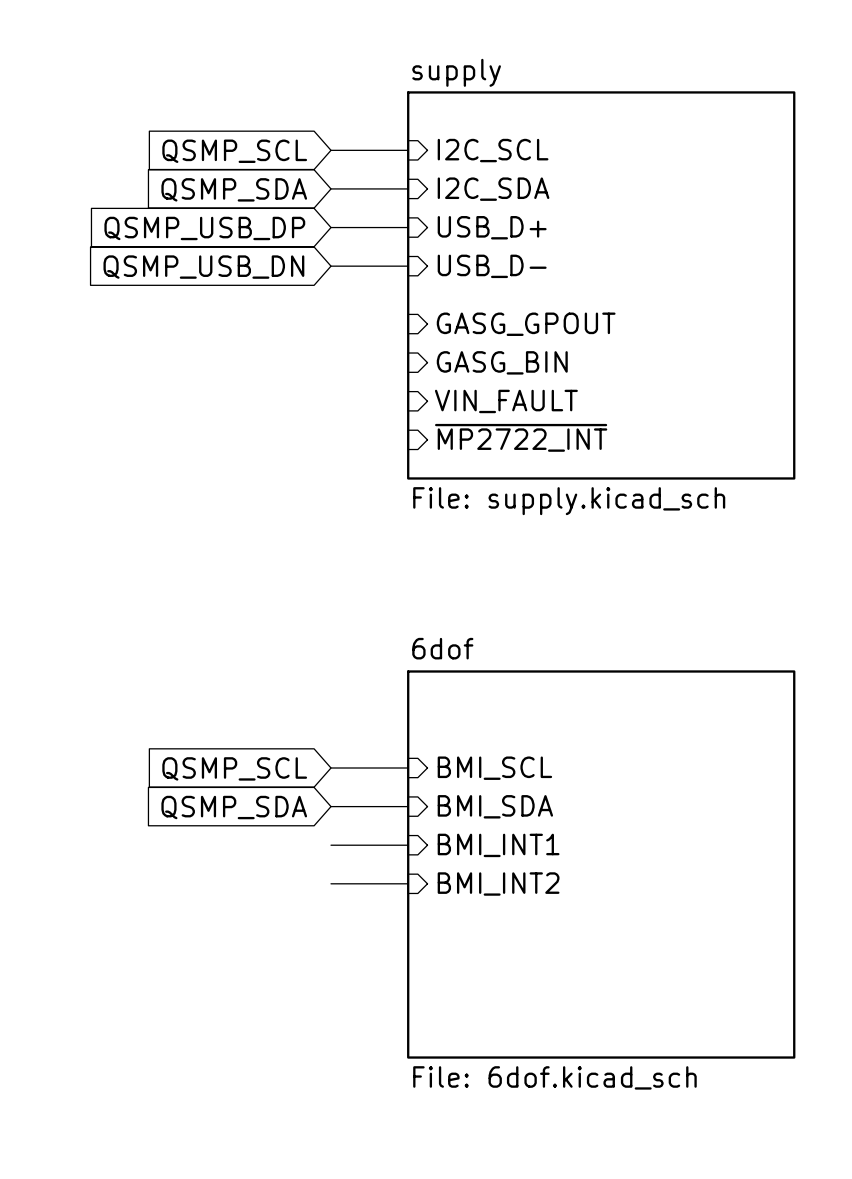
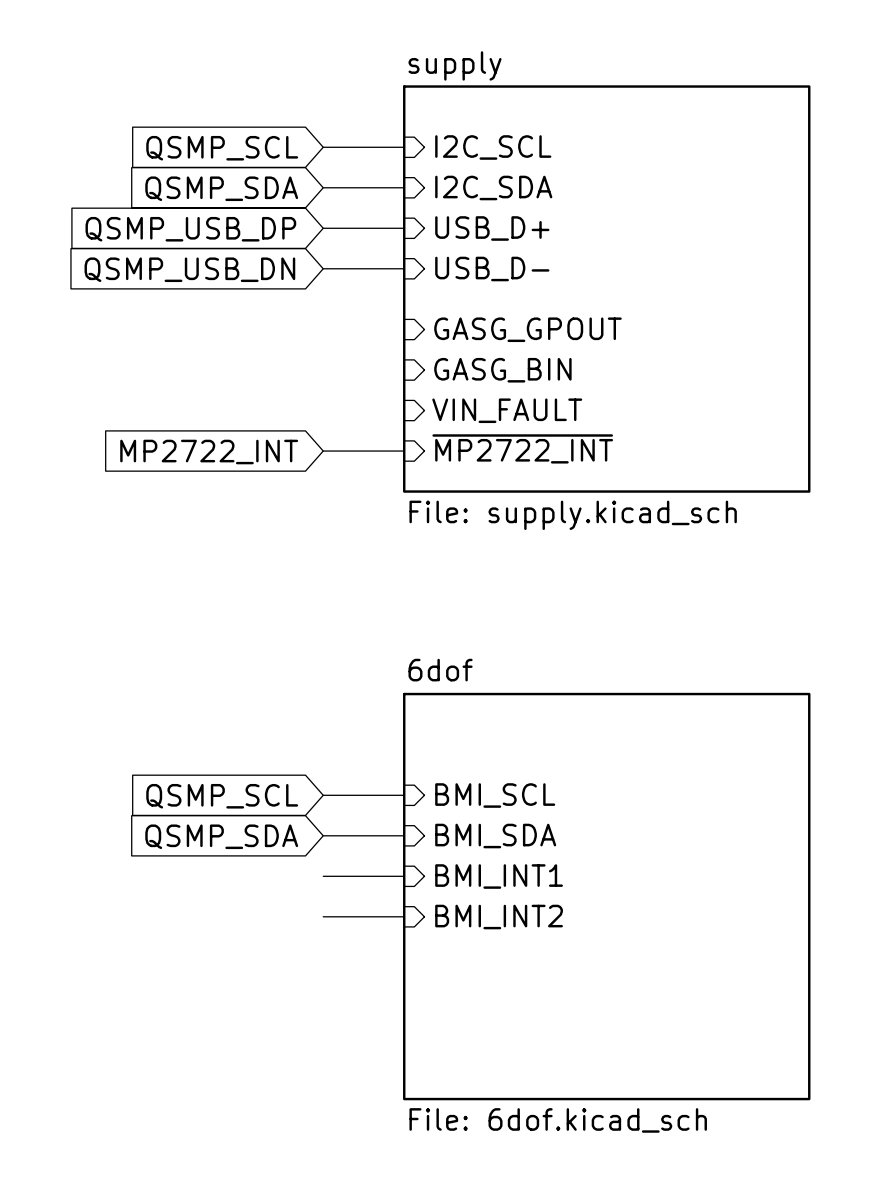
wire: none -> (323, 451) (404, 451)
global label: none -> MP2722_INT (209, 452)

